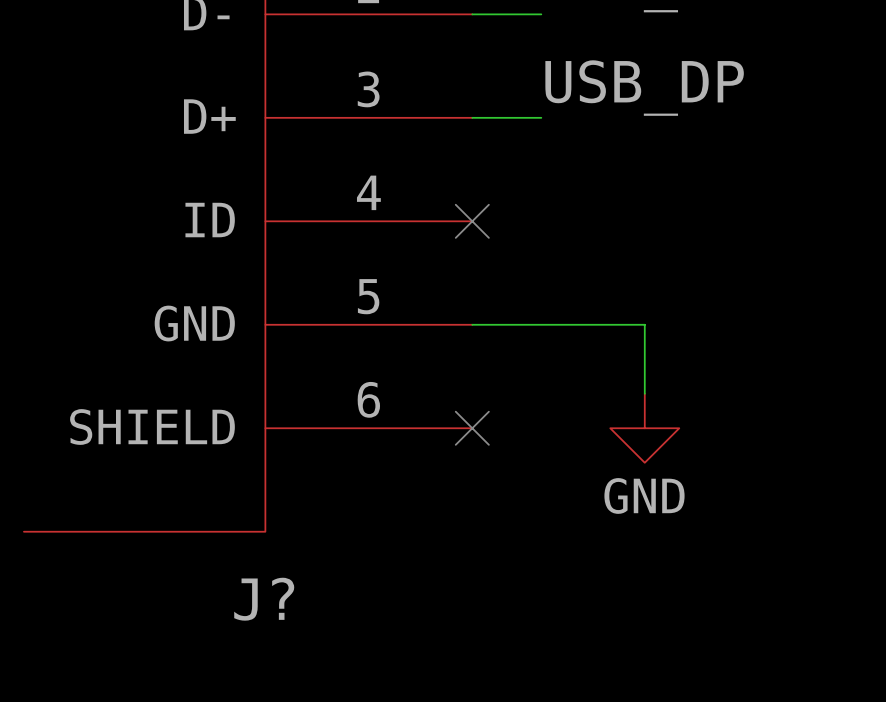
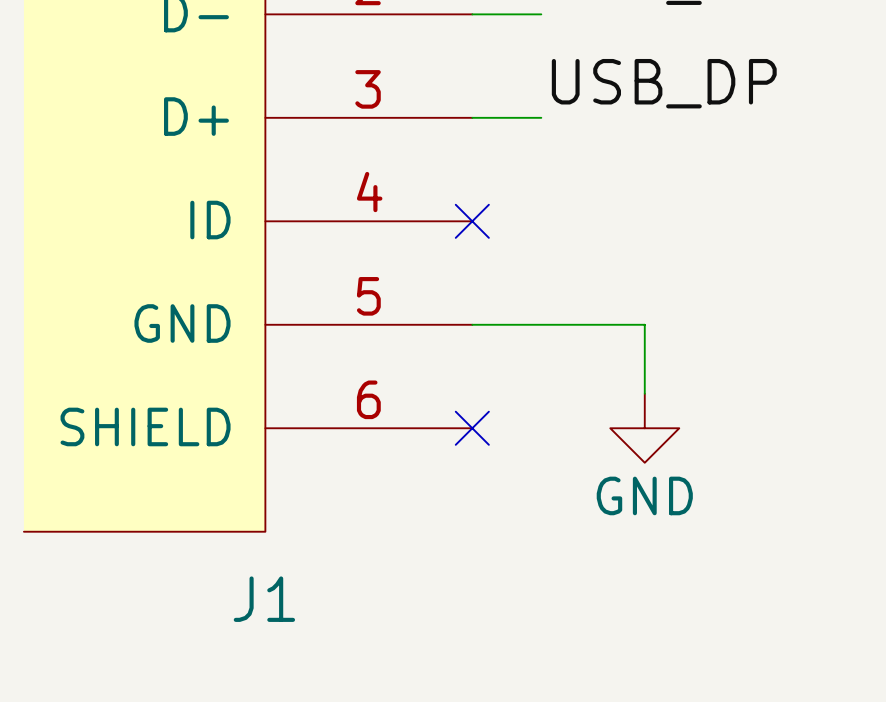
J? name: J? (264, 599) -> J1 (264, 599)

